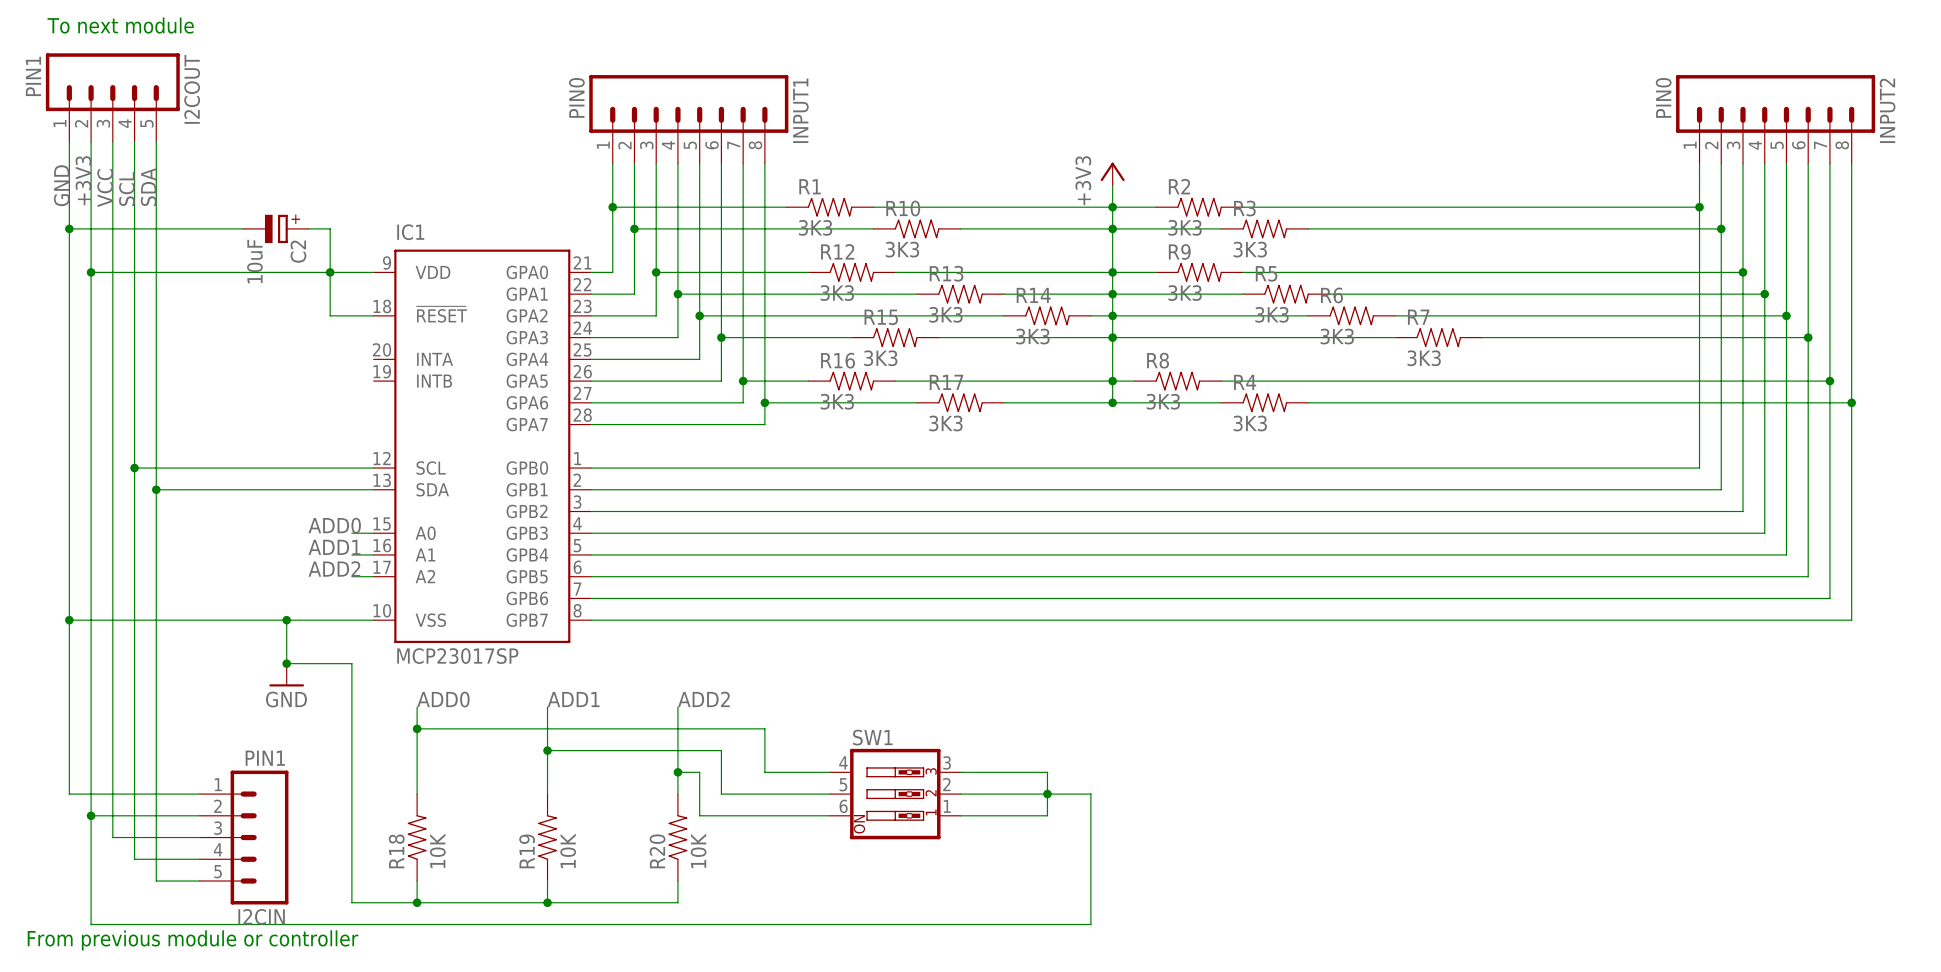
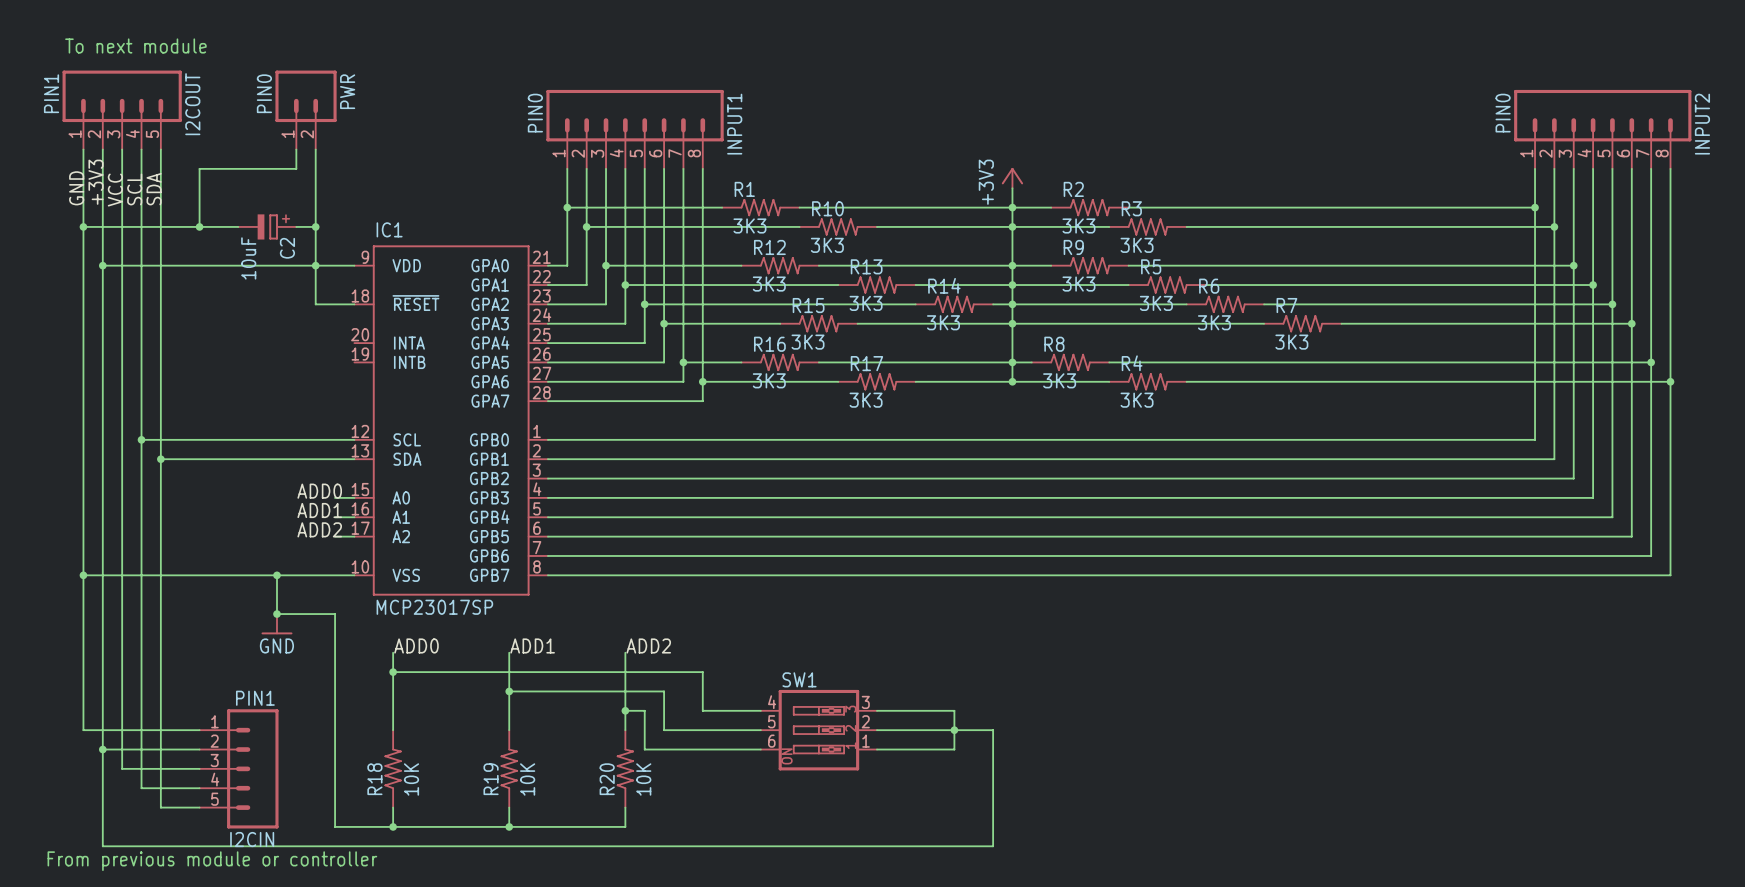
PWR: none -> PIN0 (306, 110)
wire: none -> (296, 149) (296, 168) (199, 168) (199, 226)
wire: none -> (315, 149) (315, 226)
junction: none -> (199, 226)
junction: none -> (315, 226)

